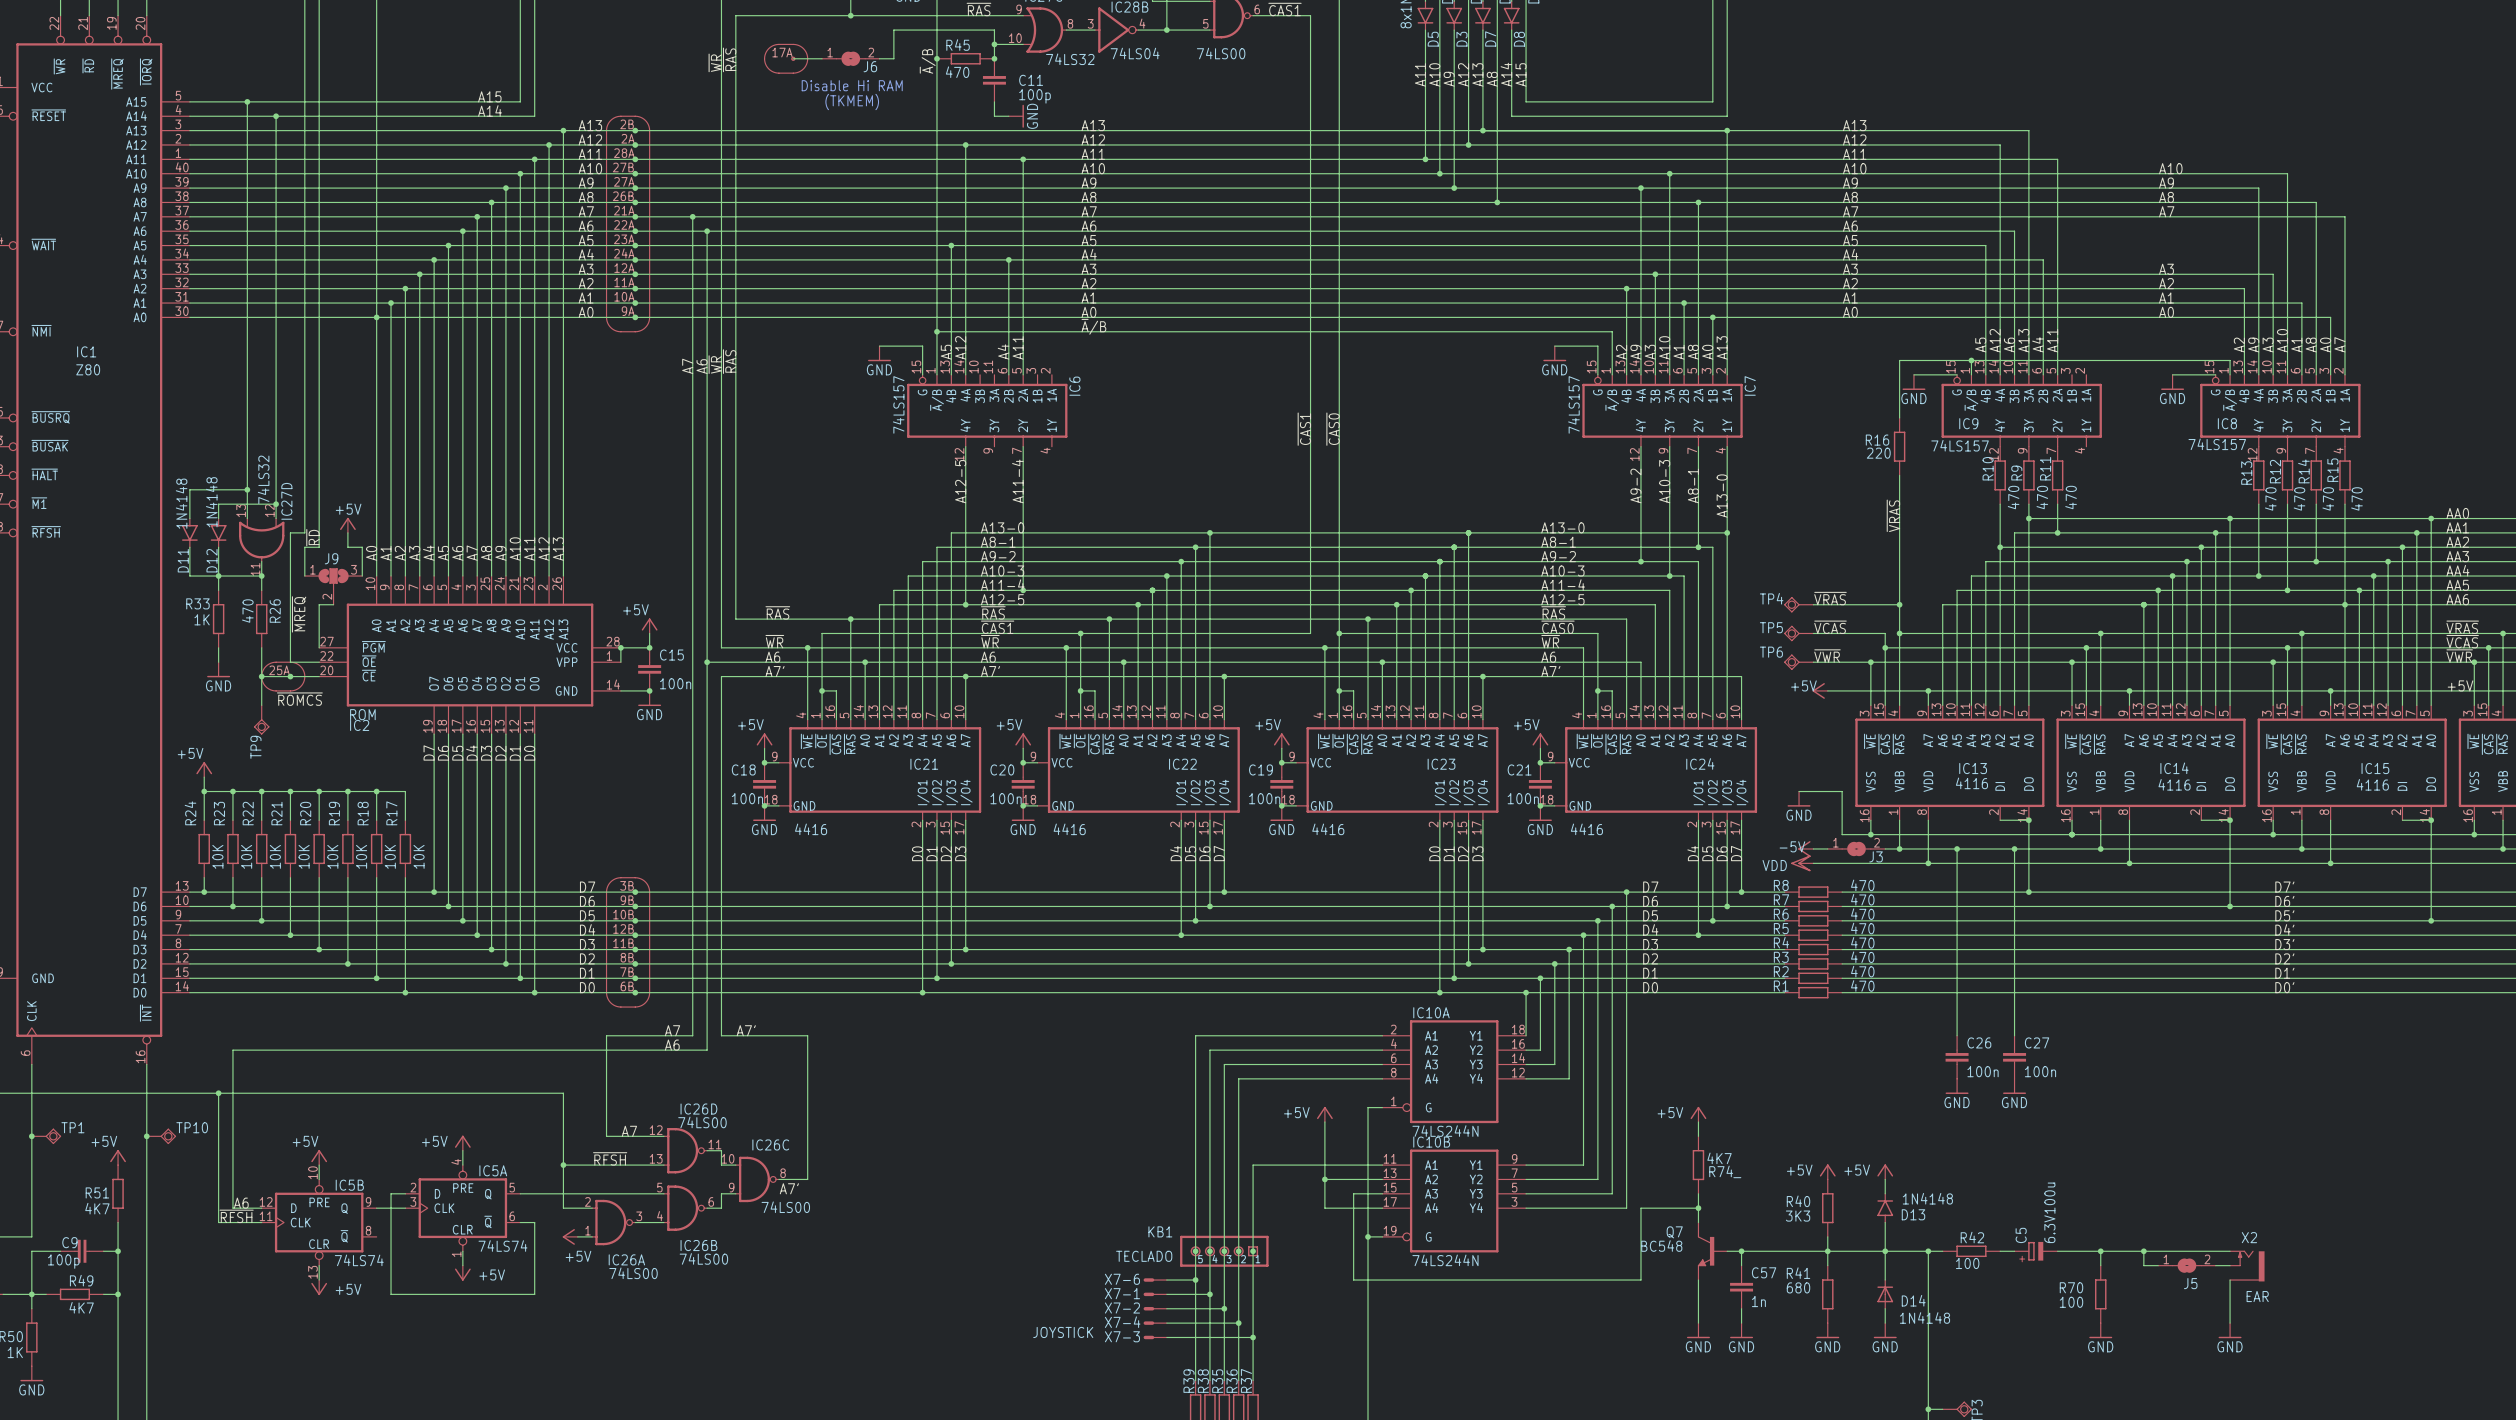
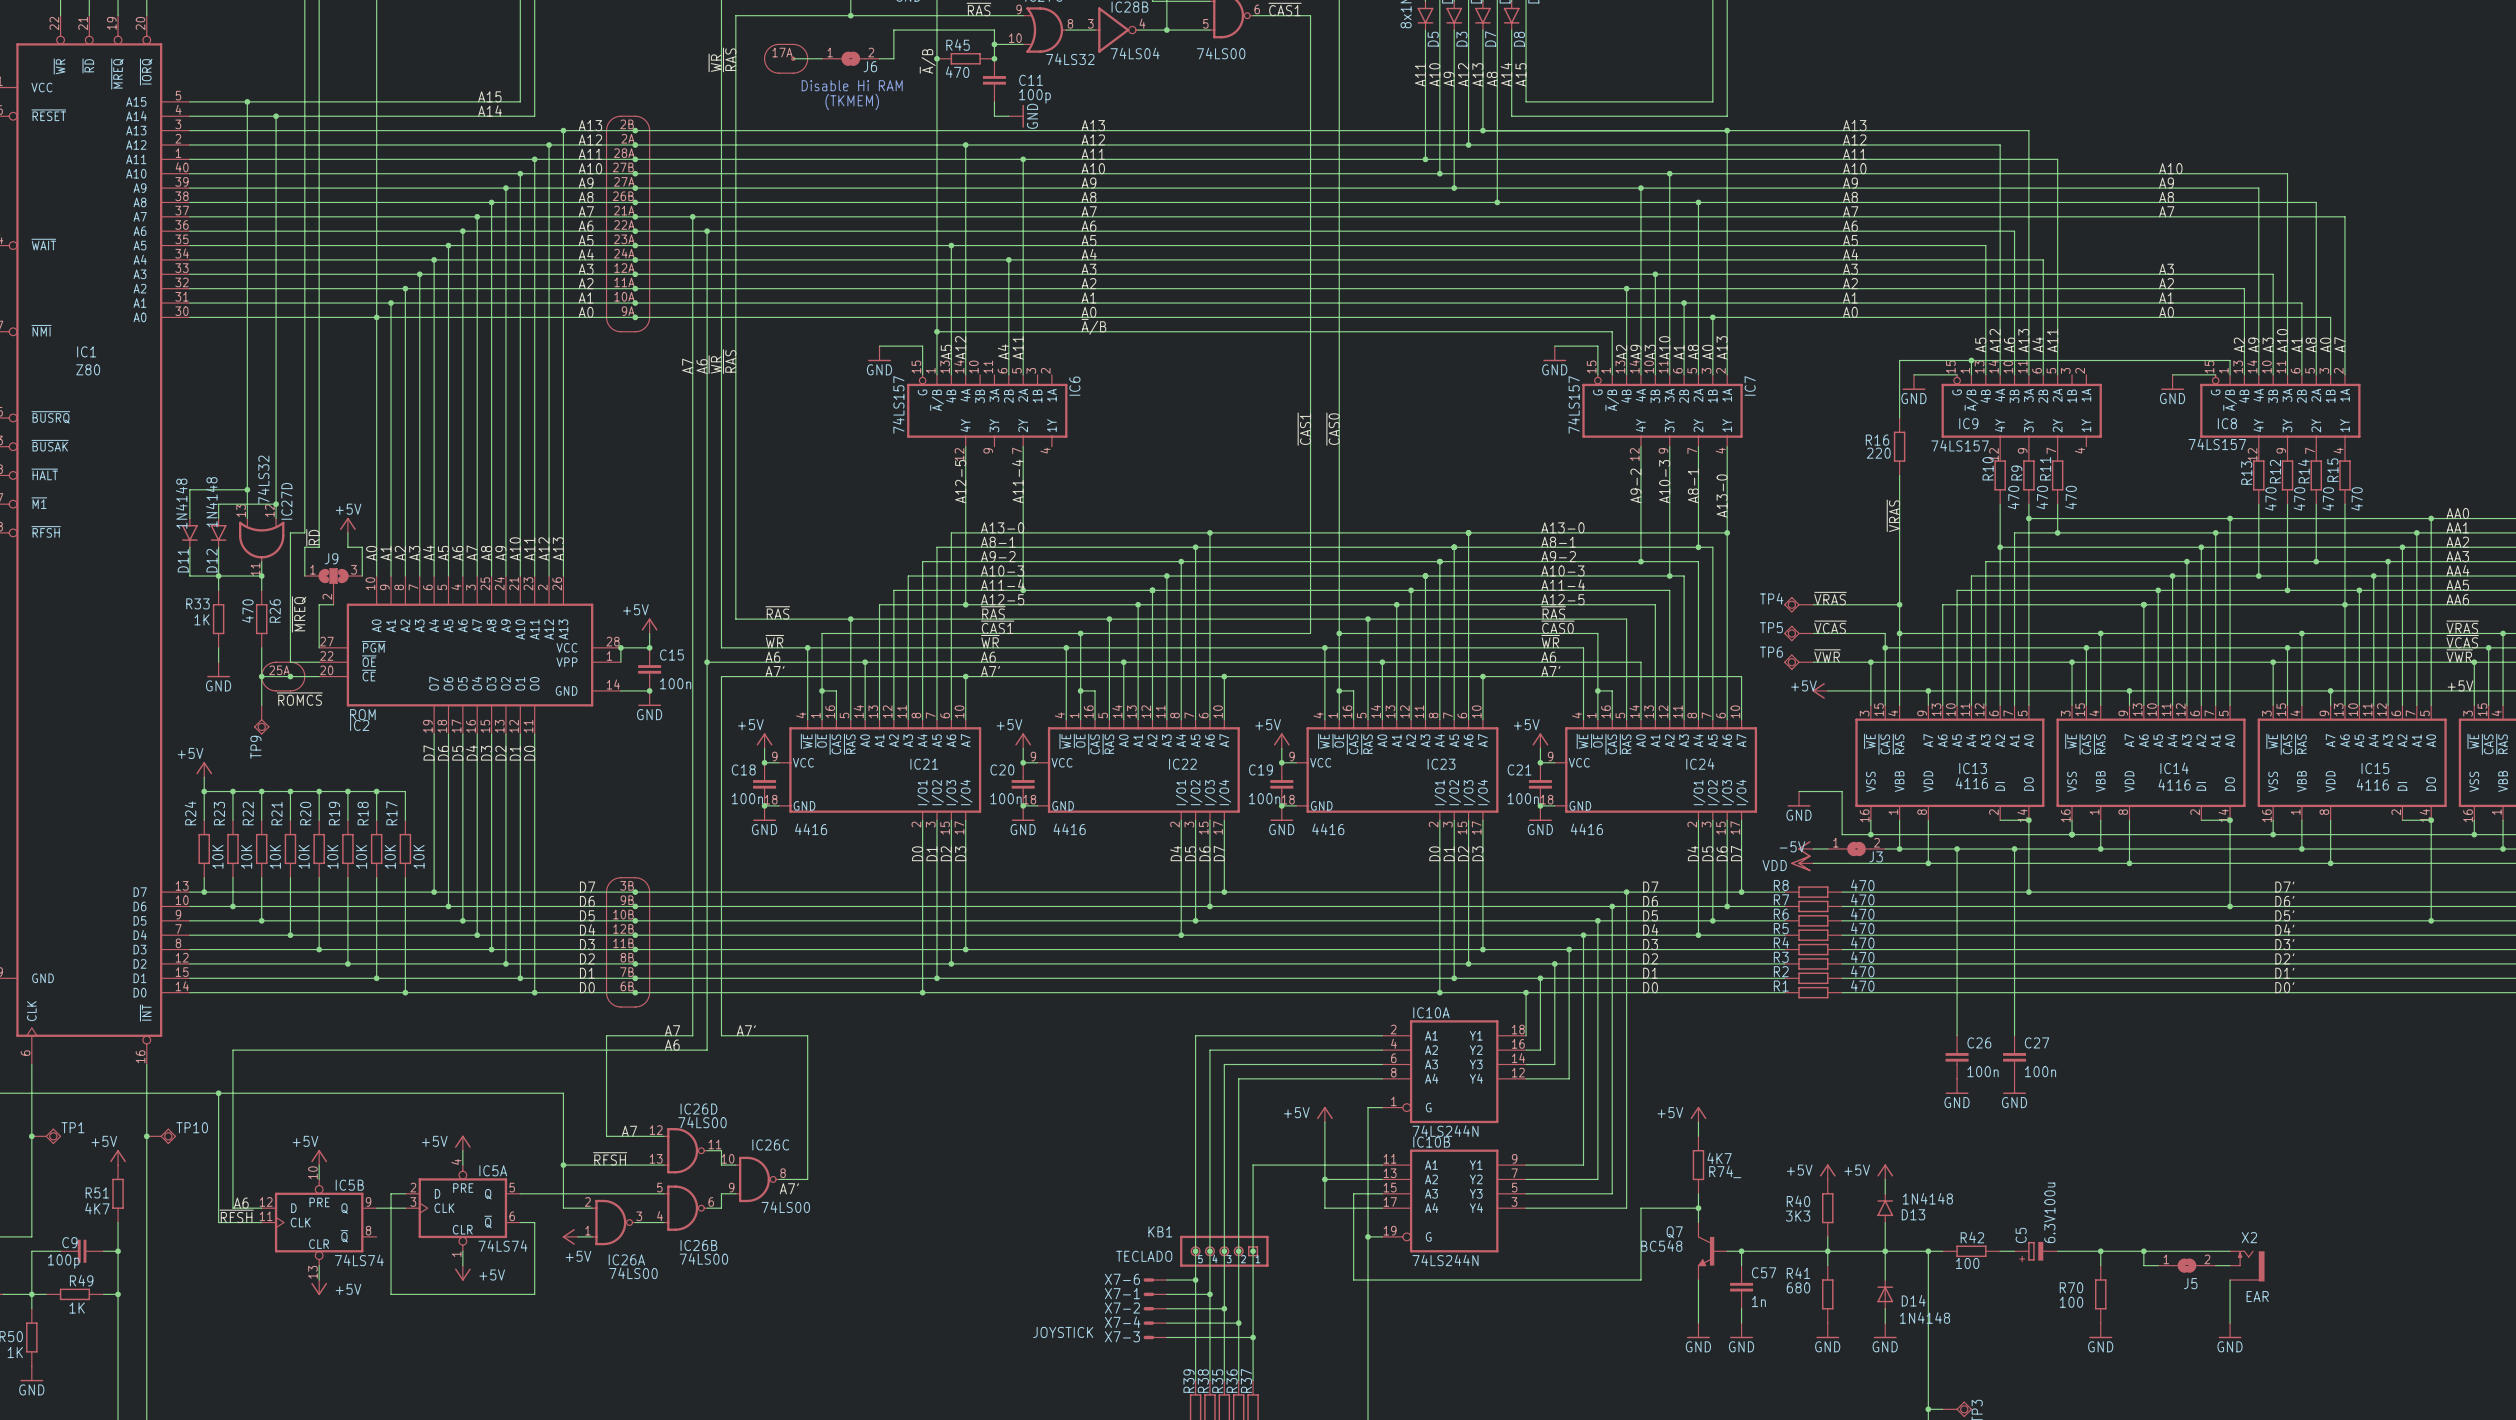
R49 value: 4K7 (81, 1307) -> 1K (77, 1308)

